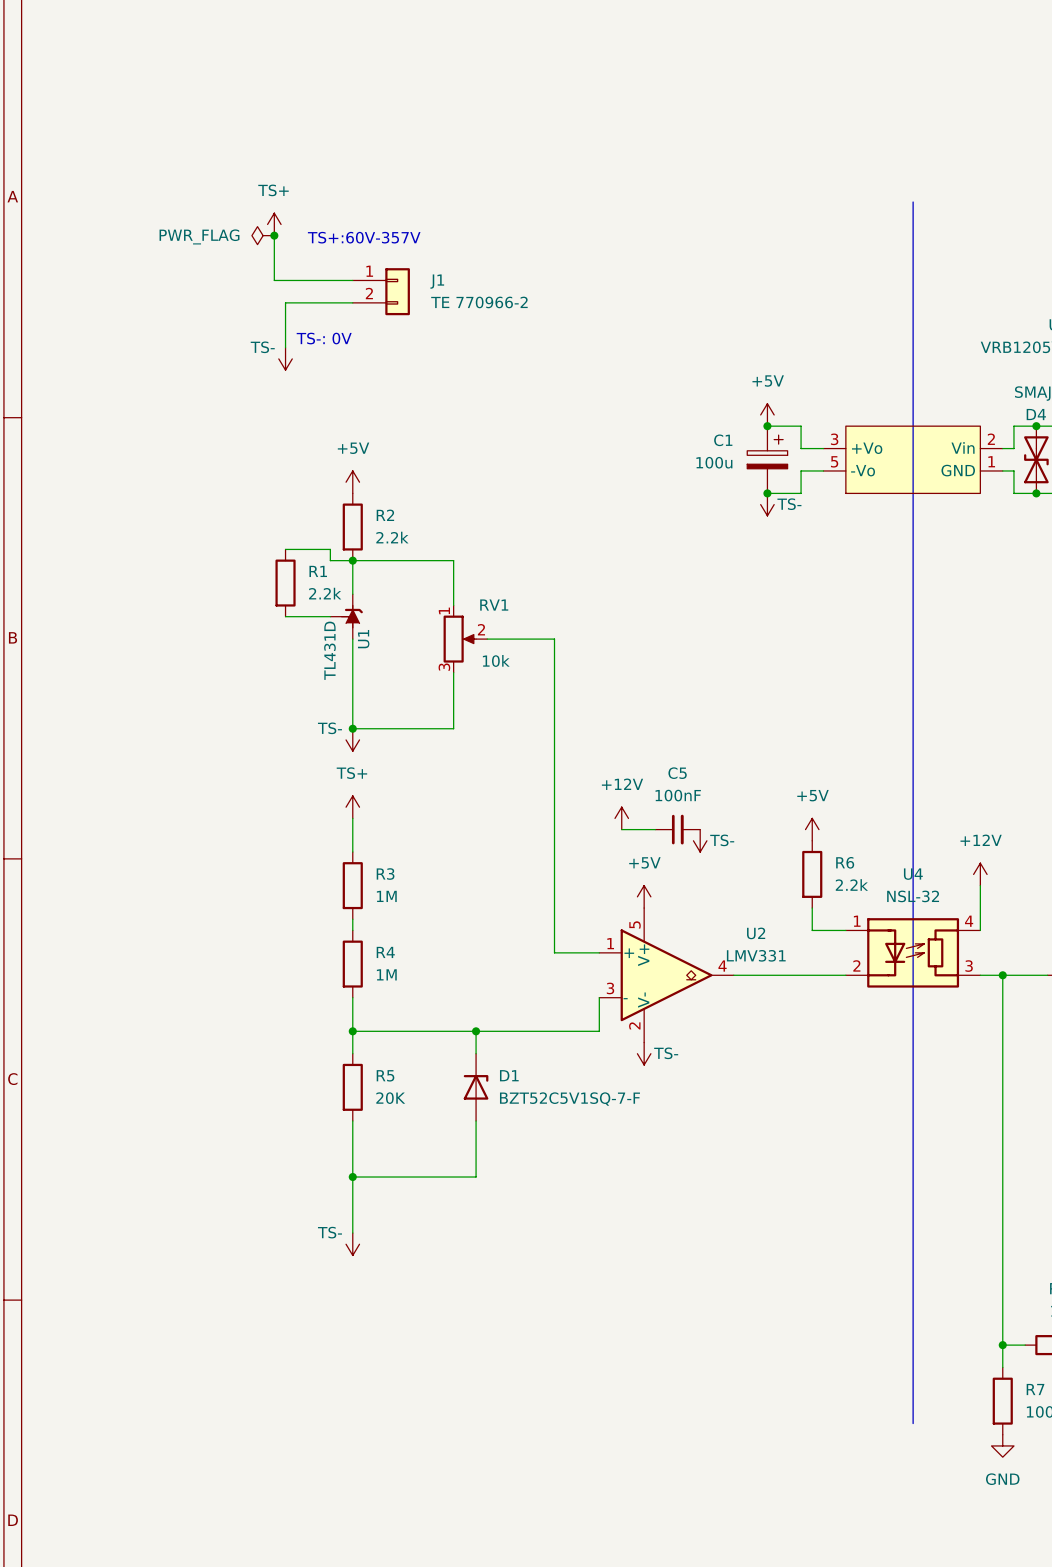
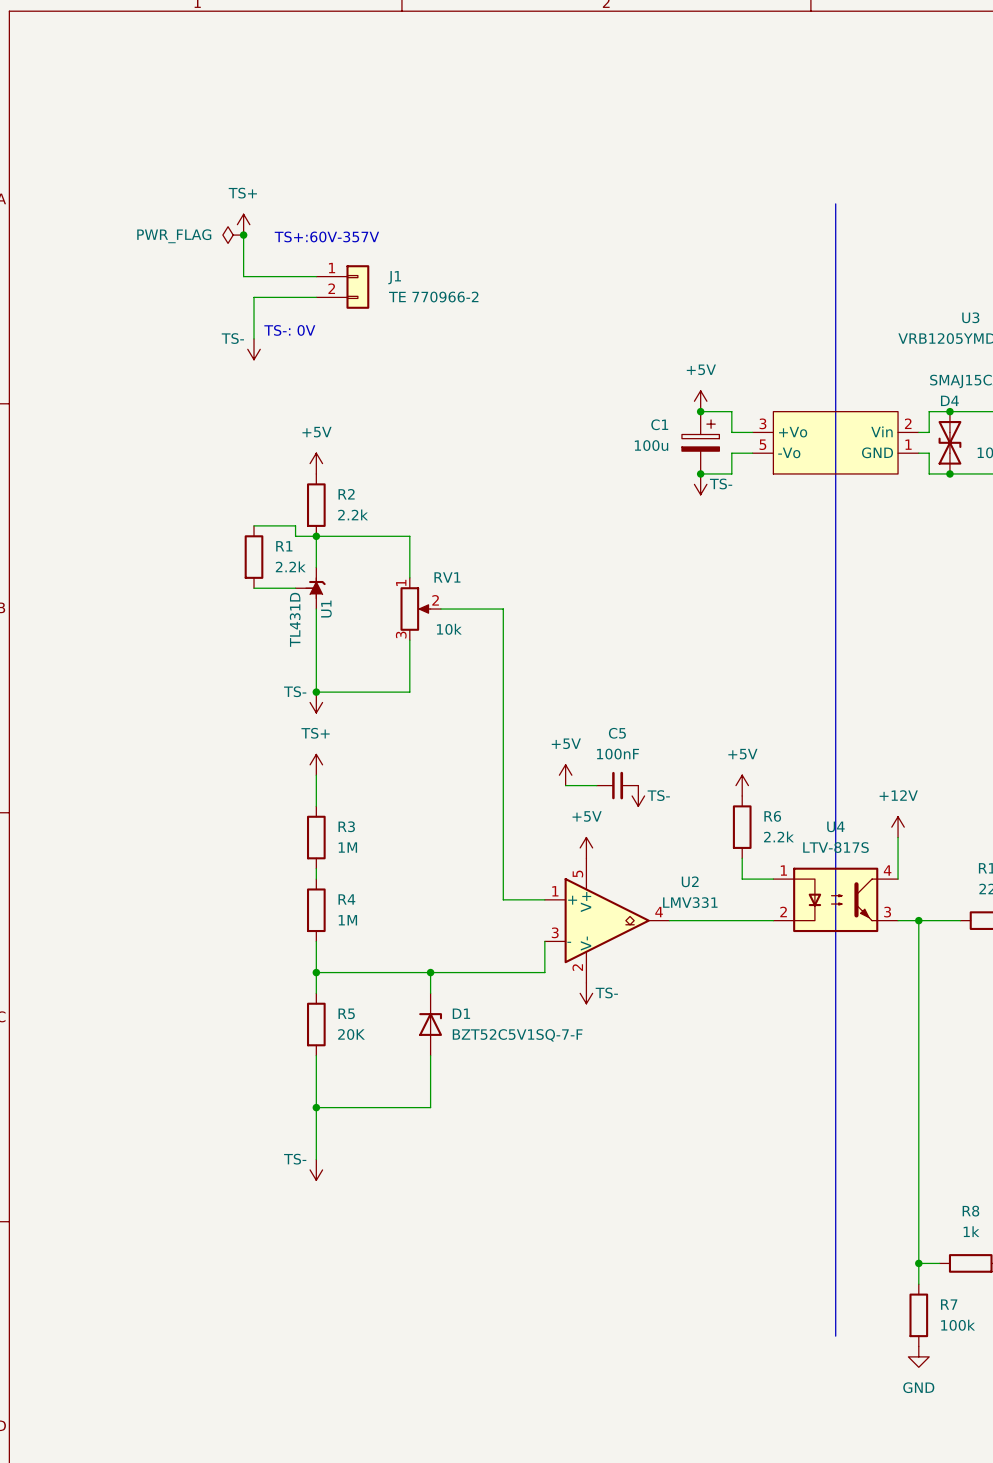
power symbol: +12V (621, 818) -> +5V (565, 775)
U4 value: NSL-32 (913, 896) -> LTV-817S (836, 847)
U4 symbol: [845, 918, 981, 988] -> [773, 867, 899, 933]

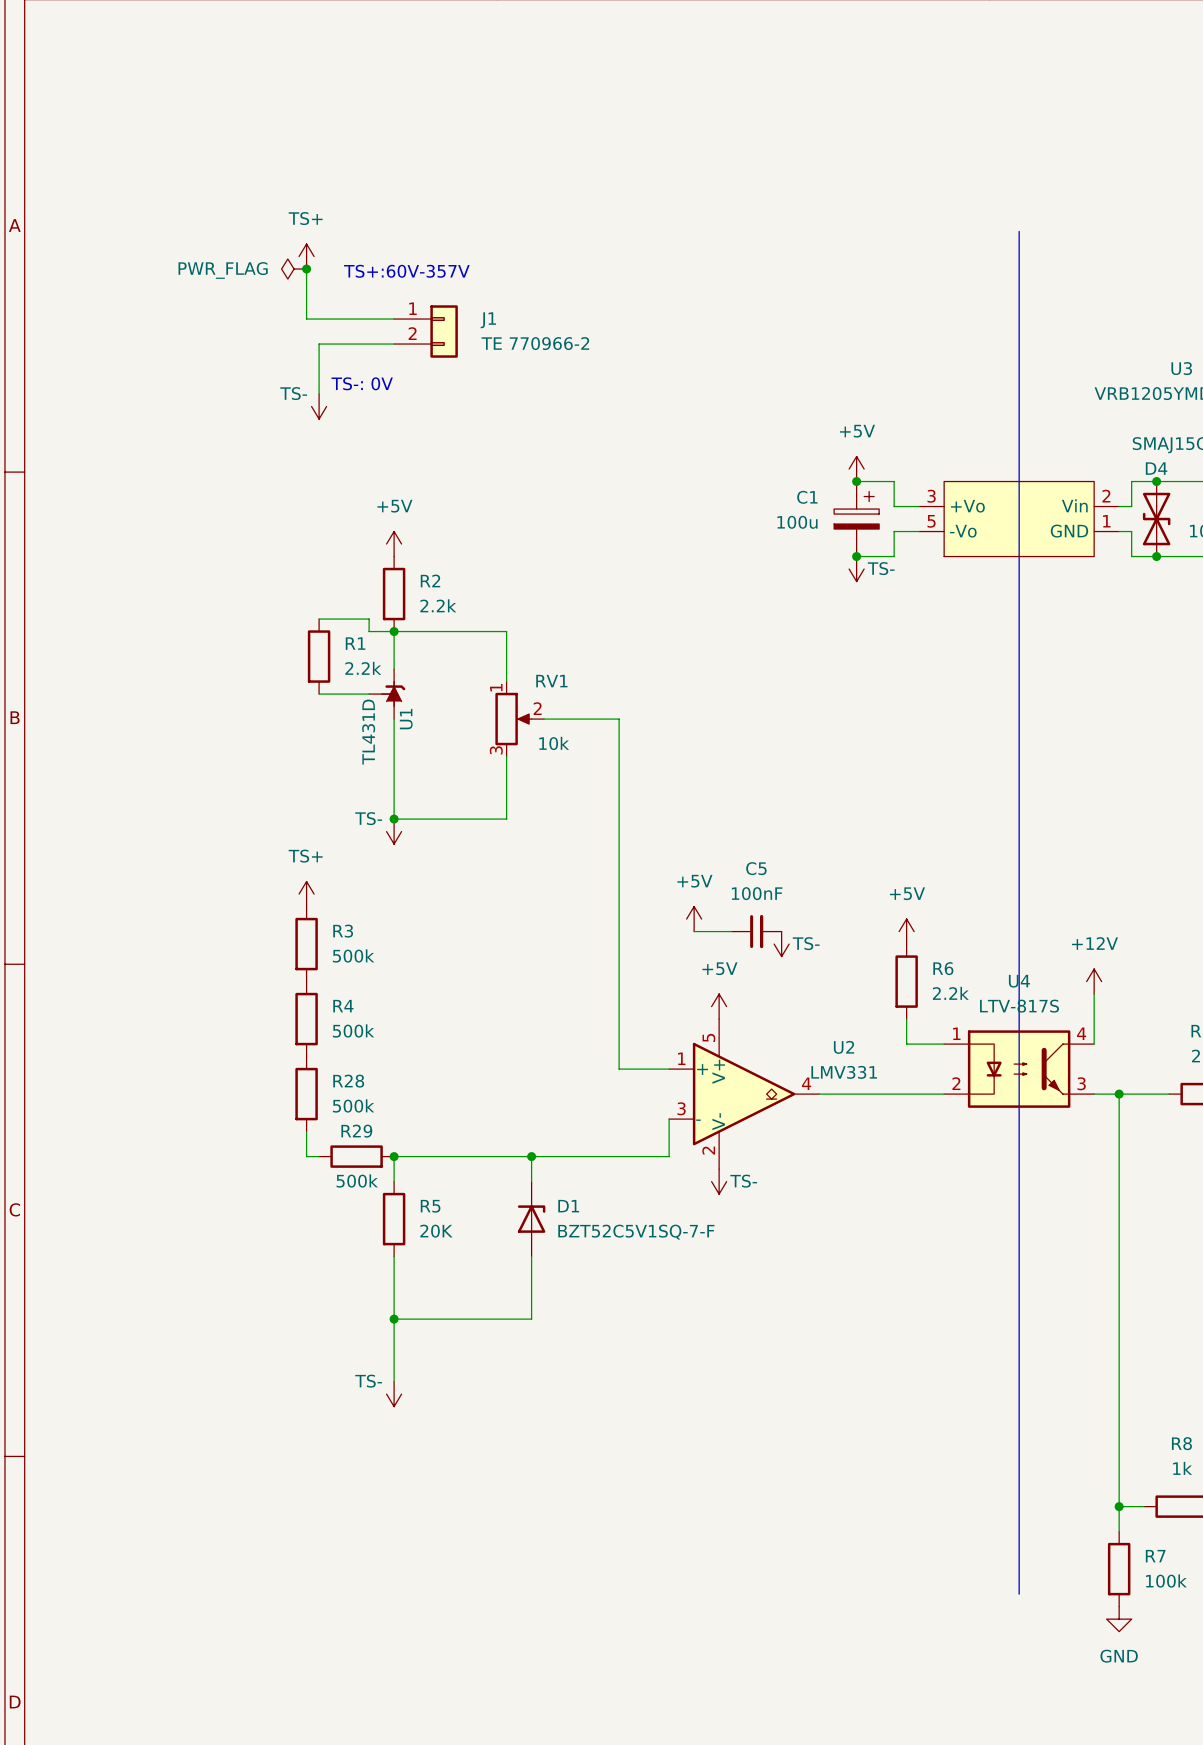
power symbol position: TS+ (316, 764) -> TS+ (306, 894)
wire: (316, 775) (316, 806) -> none
R3 position: (316, 837) -> (306, 944)
R3 value: 1M (347, 847) -> 500k (353, 955)
wire: (316, 868) (316, 879) -> none
R4 position: (316, 910) -> (306, 1019)
R28: none -> 500k (306, 1094)
R4 value: 1M (347, 920) -> 500k (353, 1030)
wire: (316, 941) (316, 972) -> none
wire: none -> (306, 1131) (306, 1156) (319, 1156)
R29: none -> 500k (356, 1156)

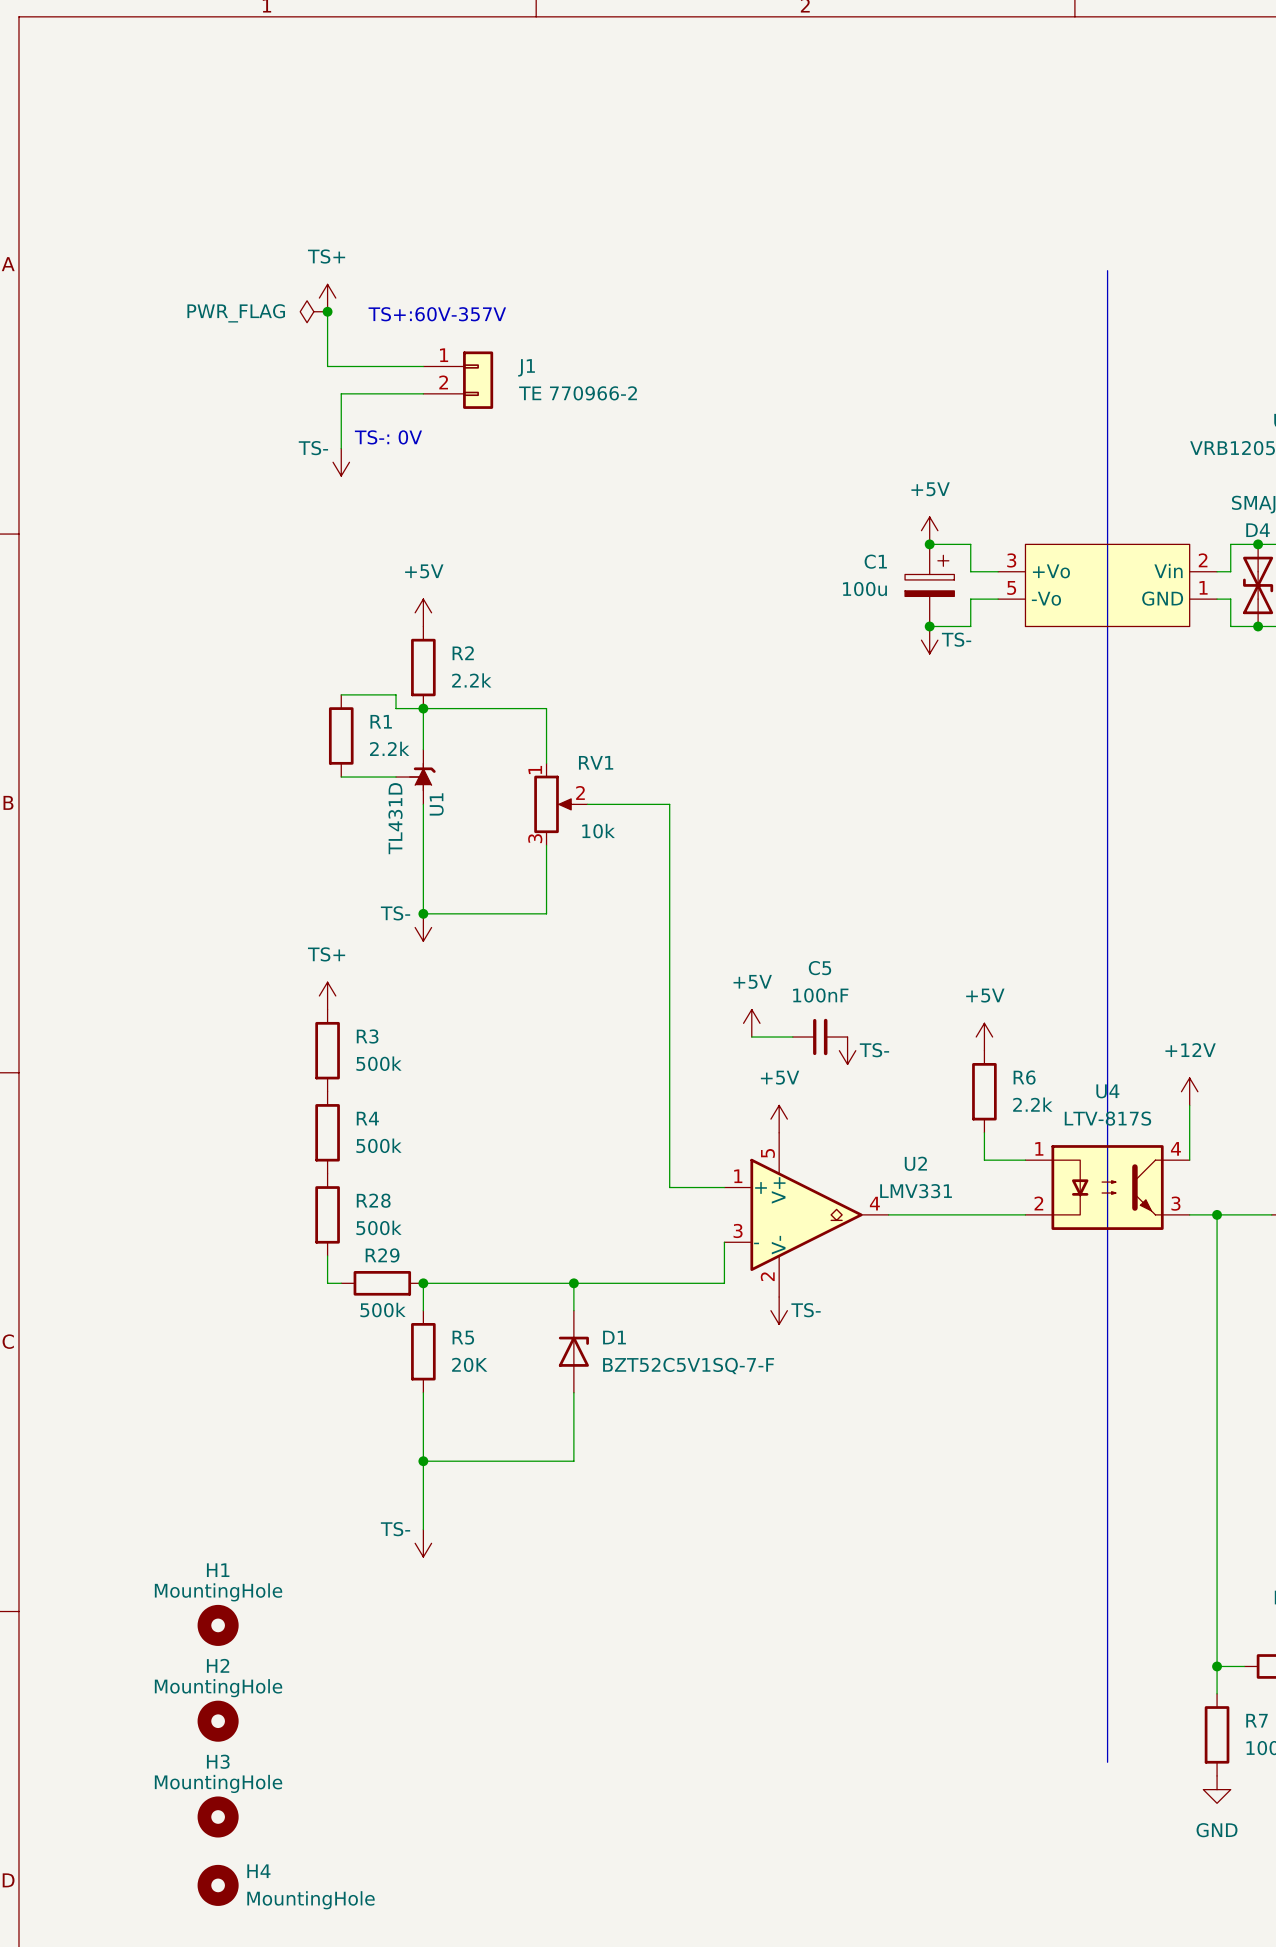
H1: none -> MountingHole (218, 1625)
H2: none -> MountingHole (218, 1721)
H3: none -> MountingHole (218, 1816)
H4: none -> MountingHole (218, 1885)

